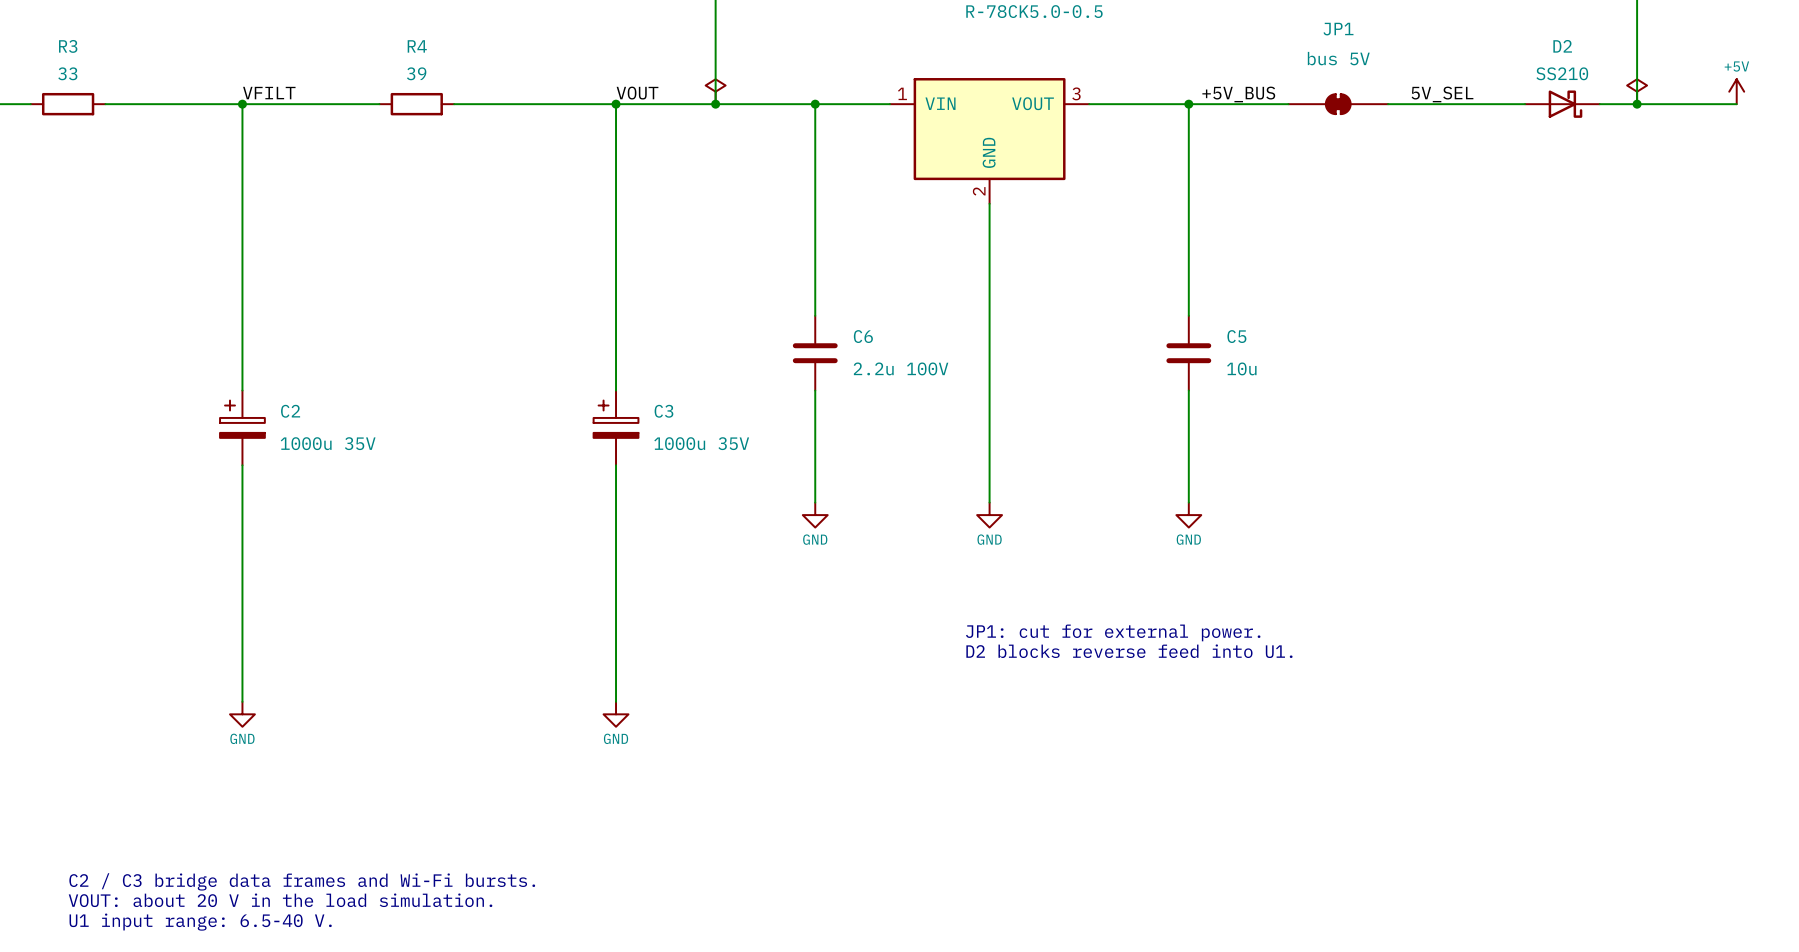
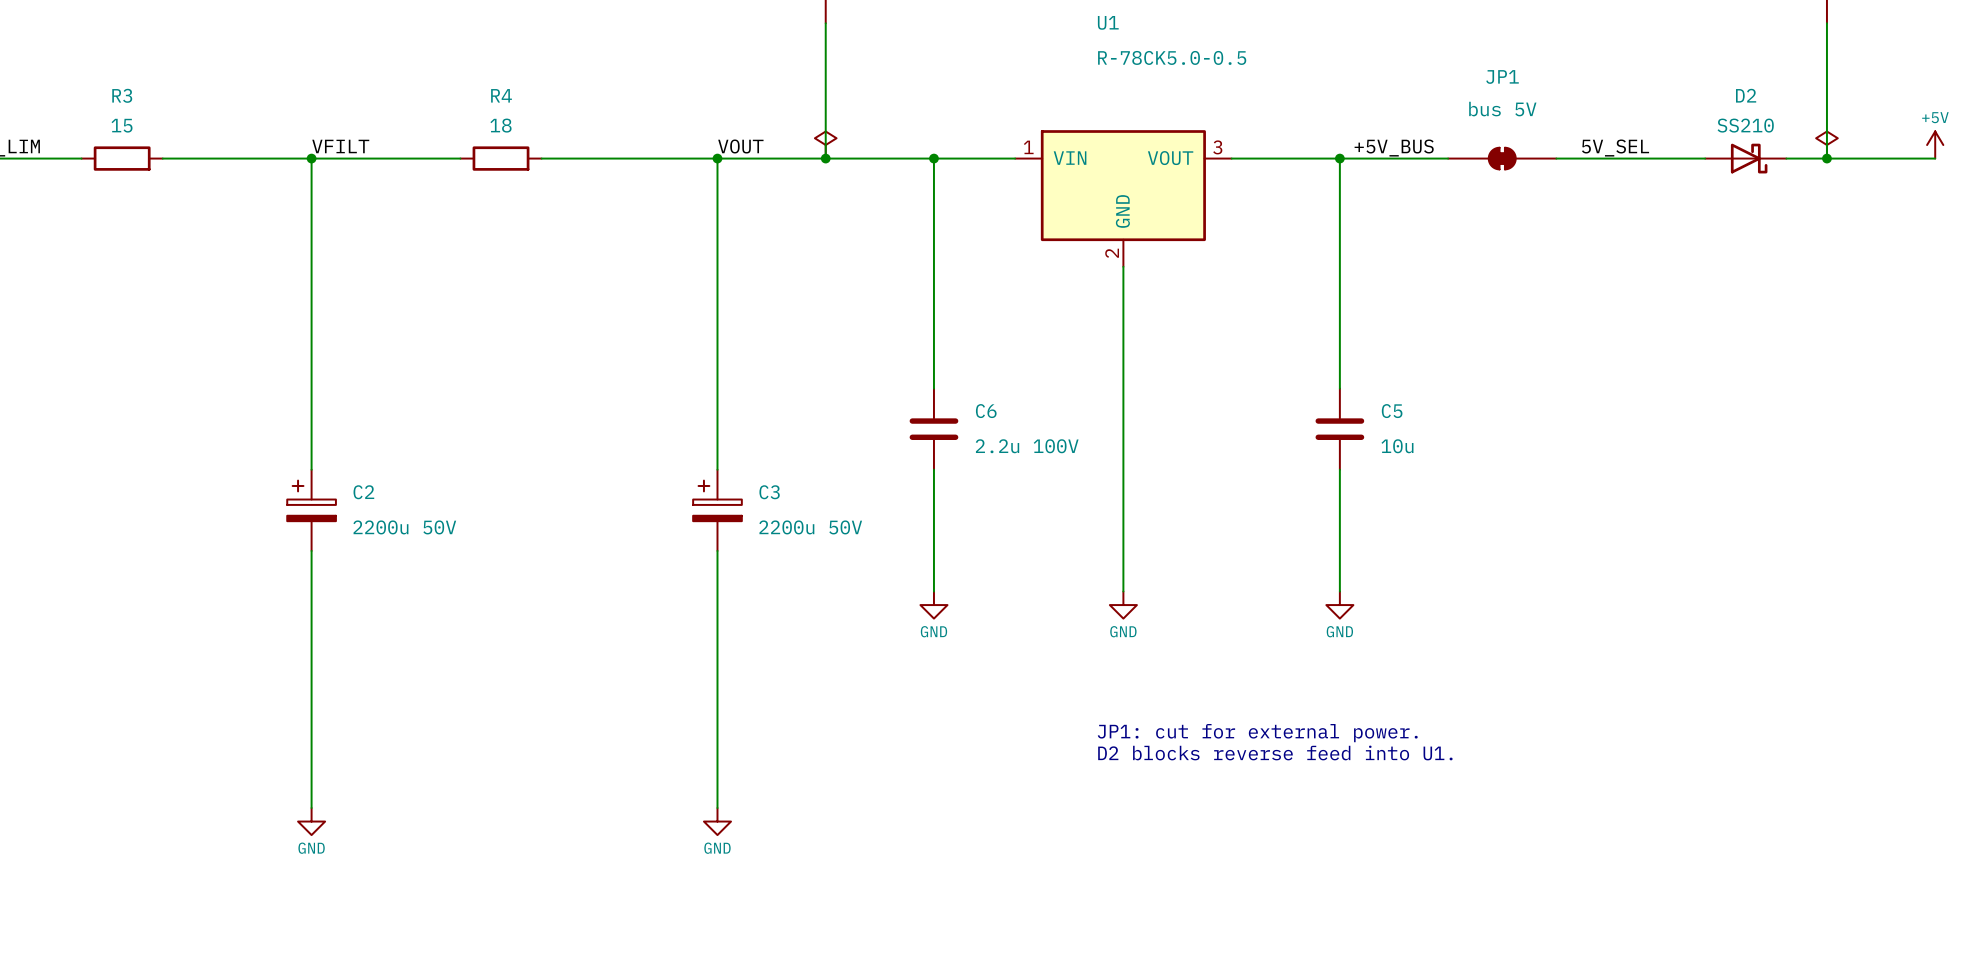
R3 value: 33 (67, 73) -> 15 (122, 125)
R4 value: 39 (416, 73) -> 18 (500, 125)
C2 value: 1000u 35V (328, 443) -> 2200u 50V (404, 527)
C3 value: 1000u 35V (701, 443) -> 2200u 50V (810, 527)

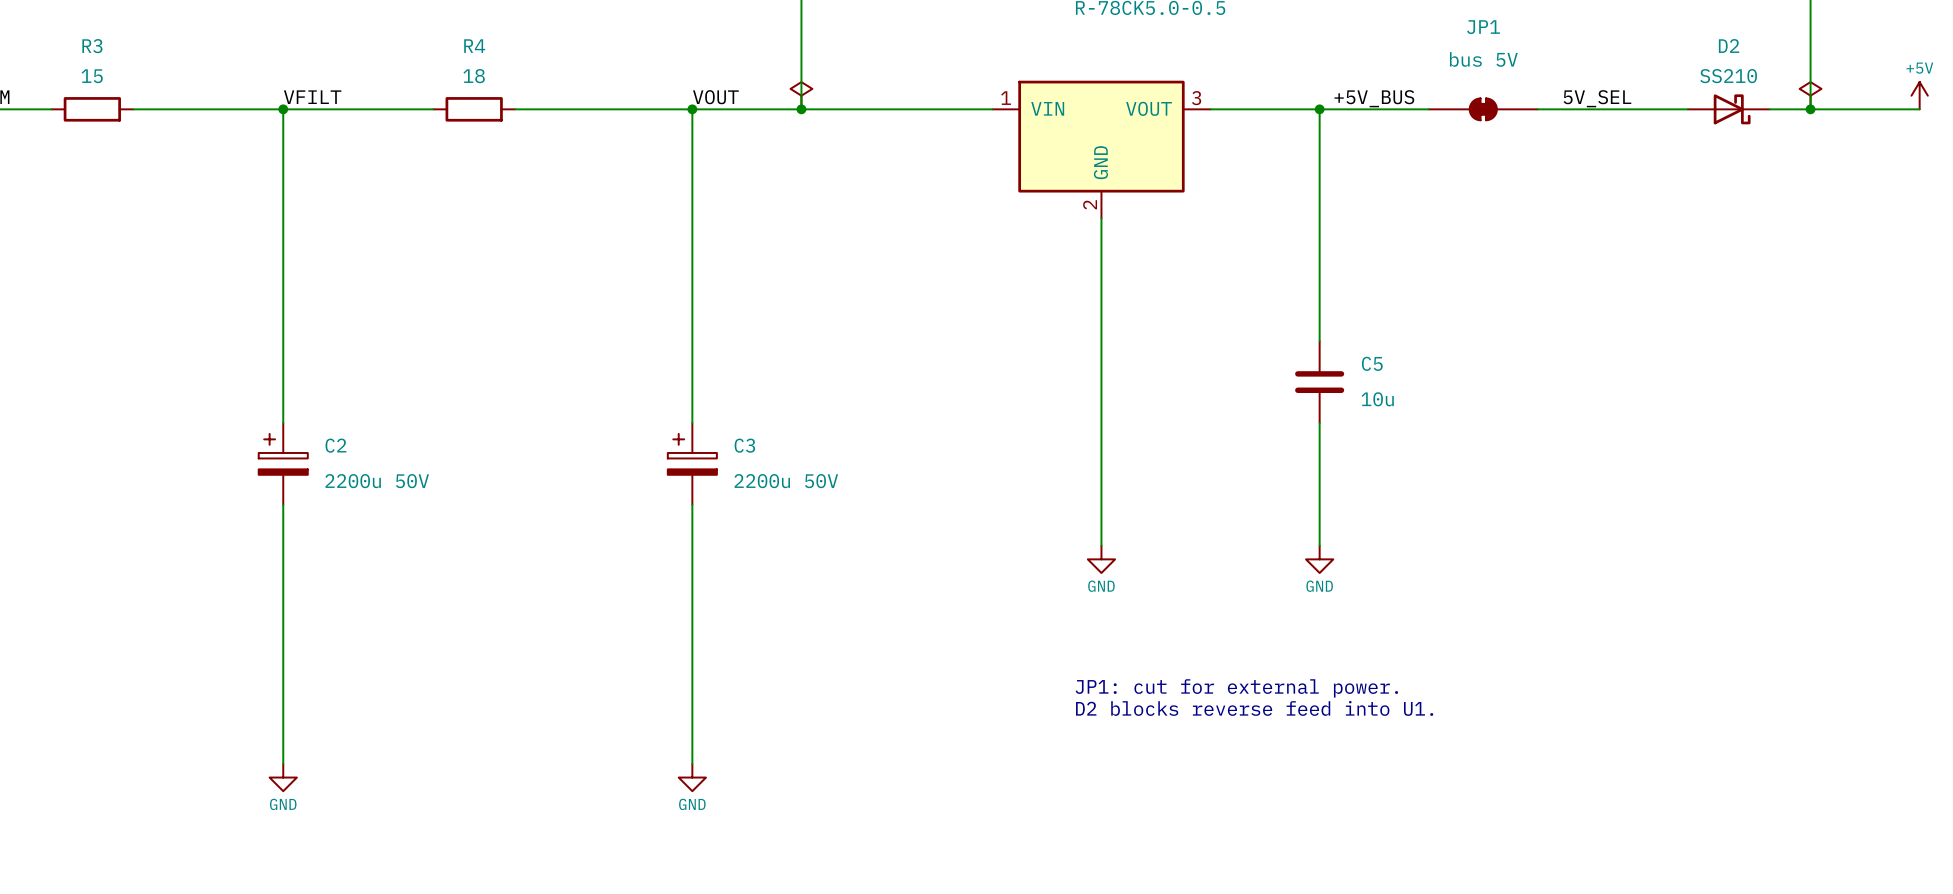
wire: (933, 158) (933, 388) -> none
junction: (933, 158) -> none
C6: 2.2u 100V (933, 429) -> none
wire: (933, 469) (933, 591) -> none
power symbol: GND (933, 605) -> none

